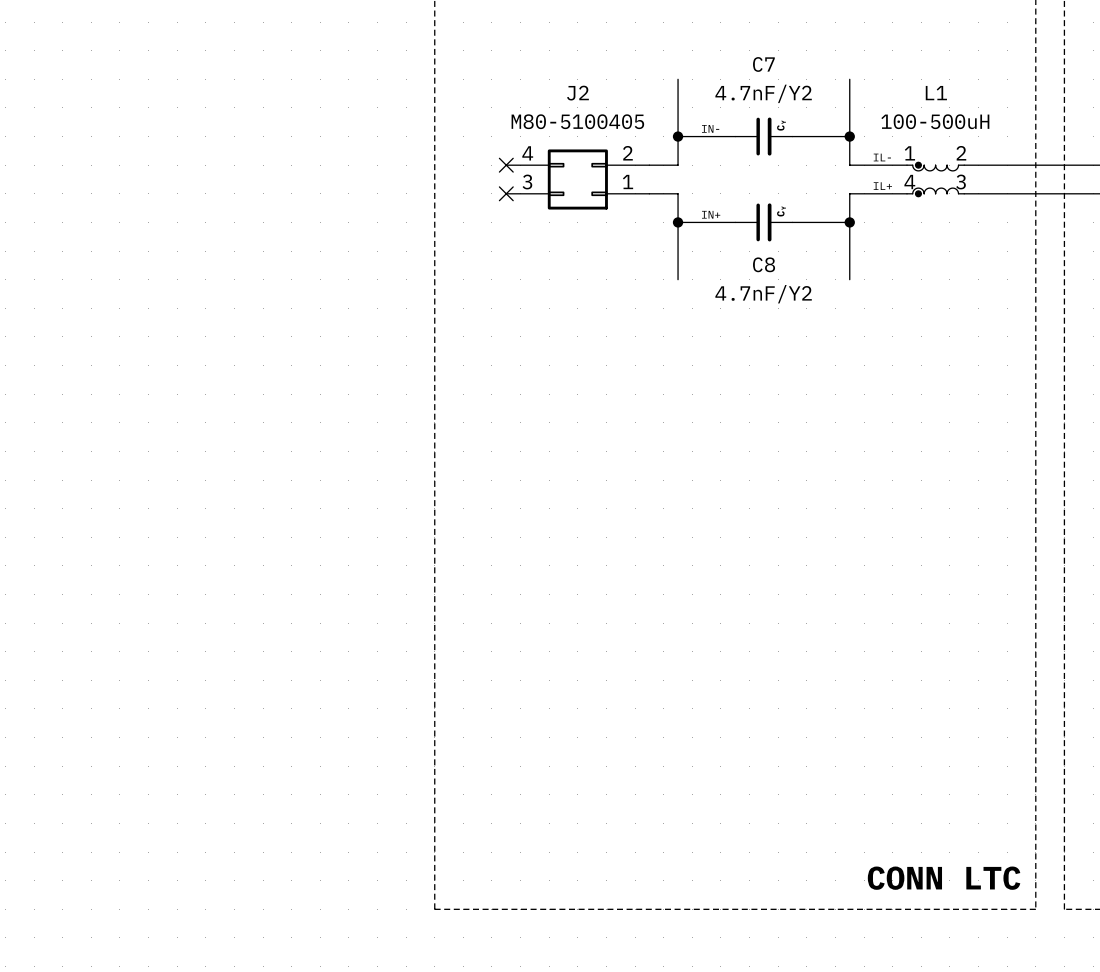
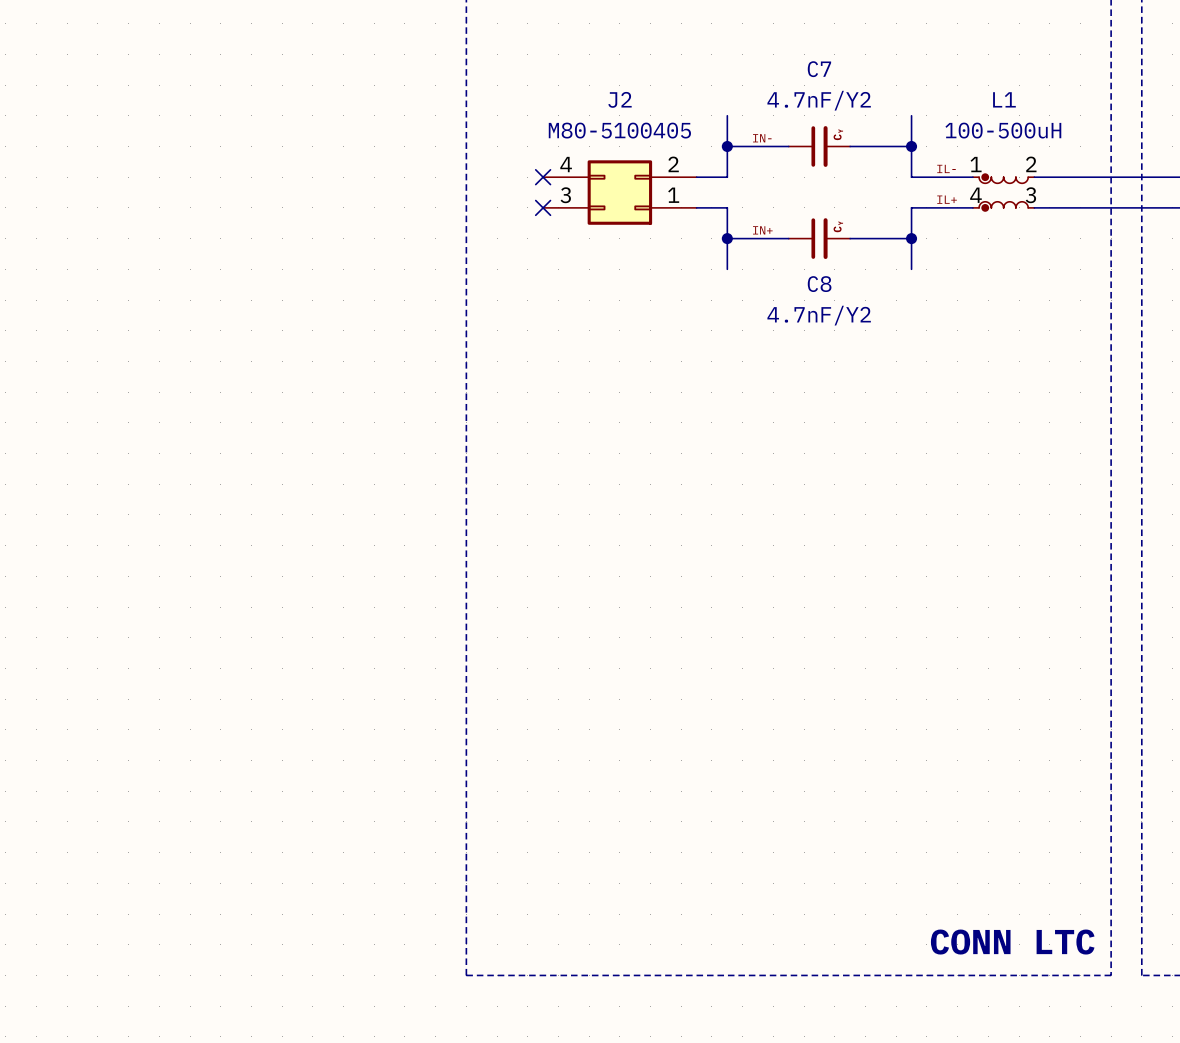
wire: (678, 79) (678, 107) -> none
wire: (849, 79) (849, 107) -> none
wire: (678, 251) (678, 279) -> none
wire: (849, 251) (849, 279) -> none

